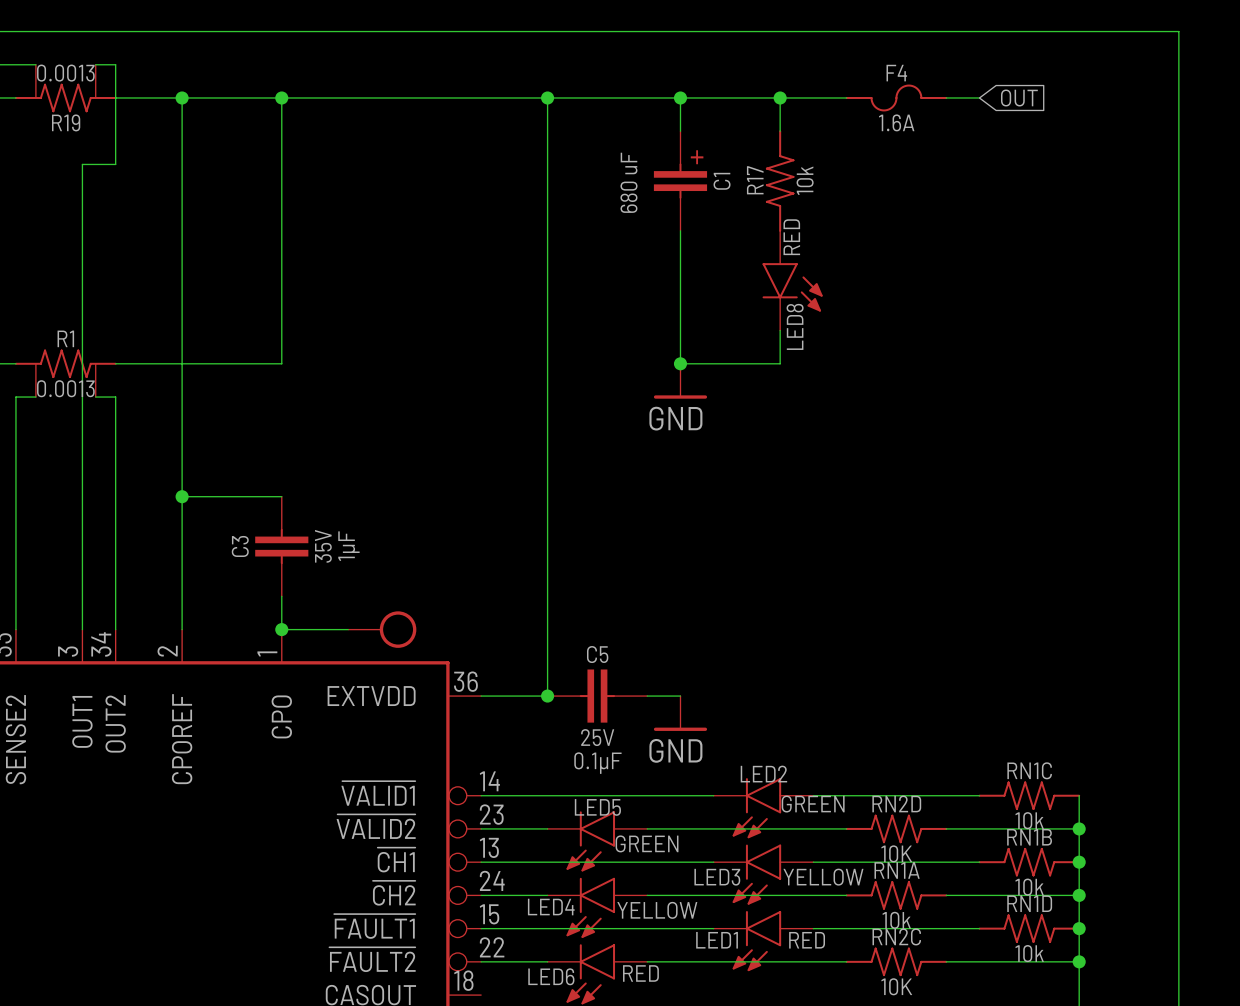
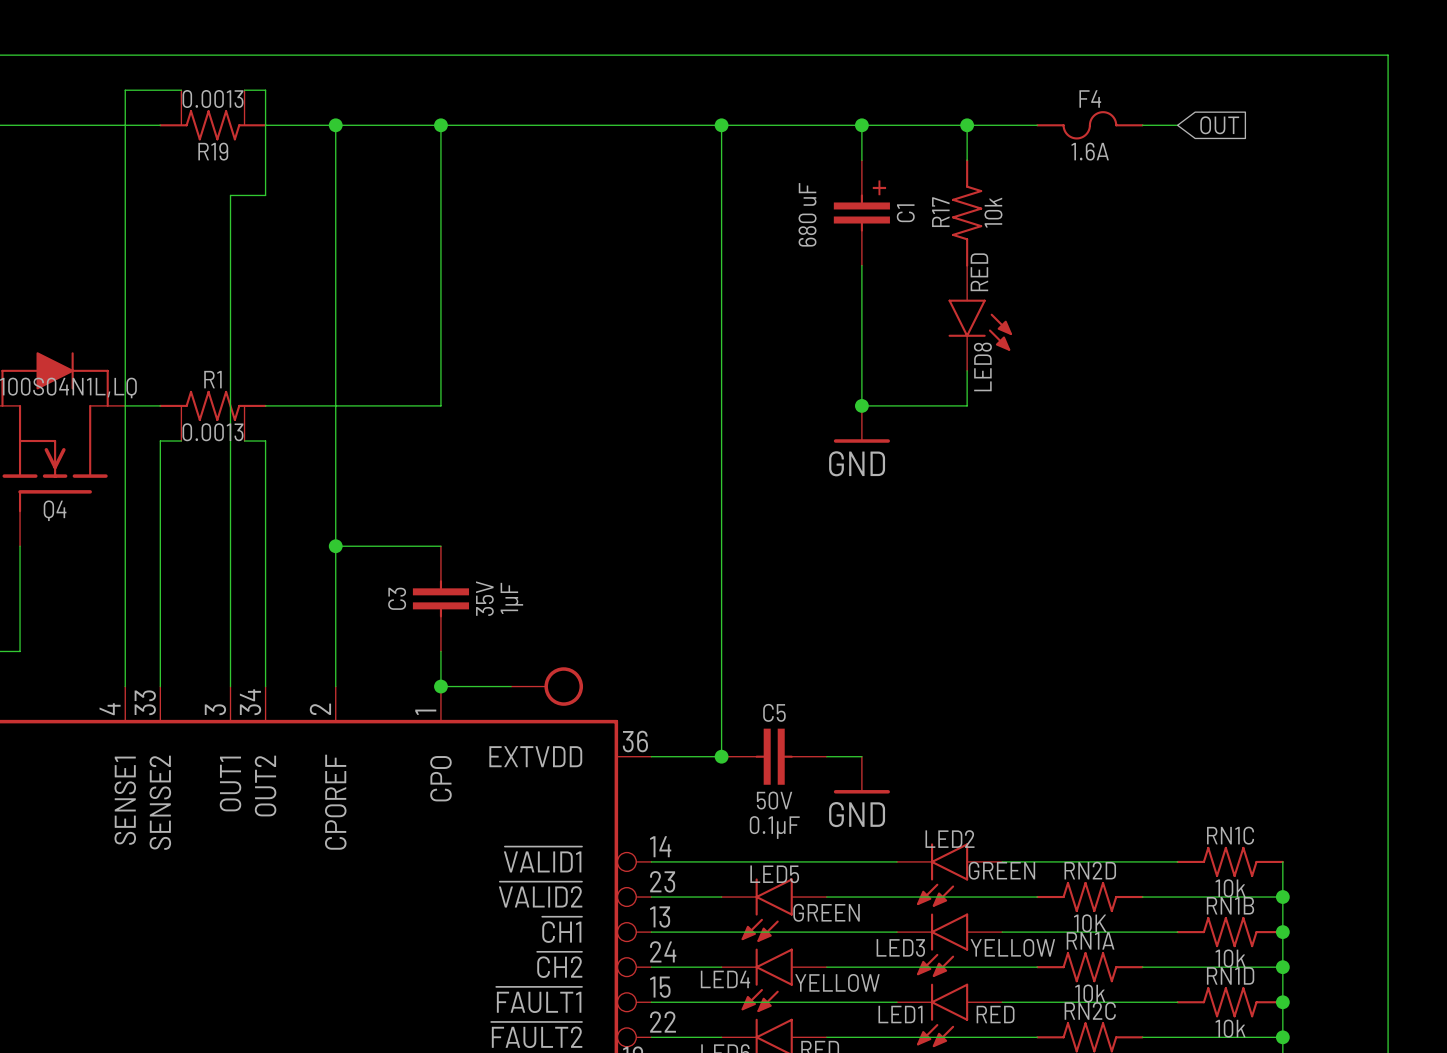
C5 text: 25V (597, 737) -> 50V (774, 800)

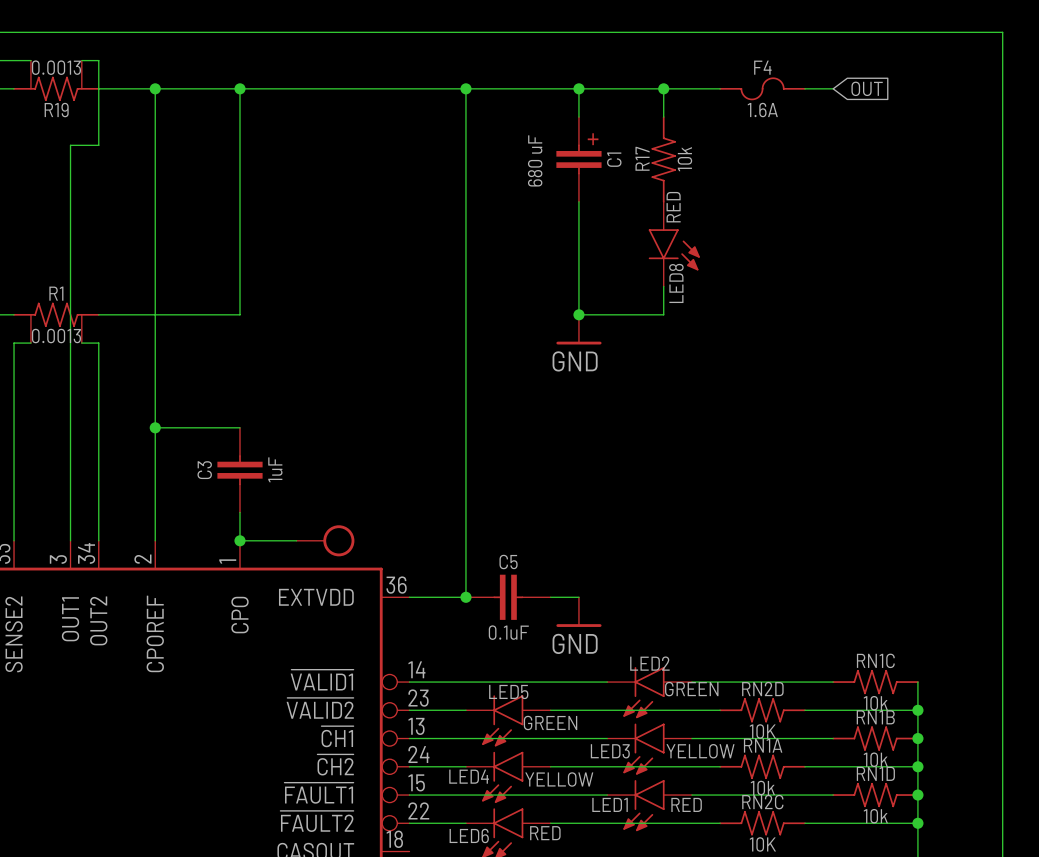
C3 text: 35V (484, 598) -> none
C3 value: none -> 1uF (275, 469)
C3 text: 1µF (511, 598) -> none
C5 text: 50V (774, 800) -> none
C5 value: none -> 0.1uF (508, 632)
C5 text: 0.1µF (774, 827) -> none

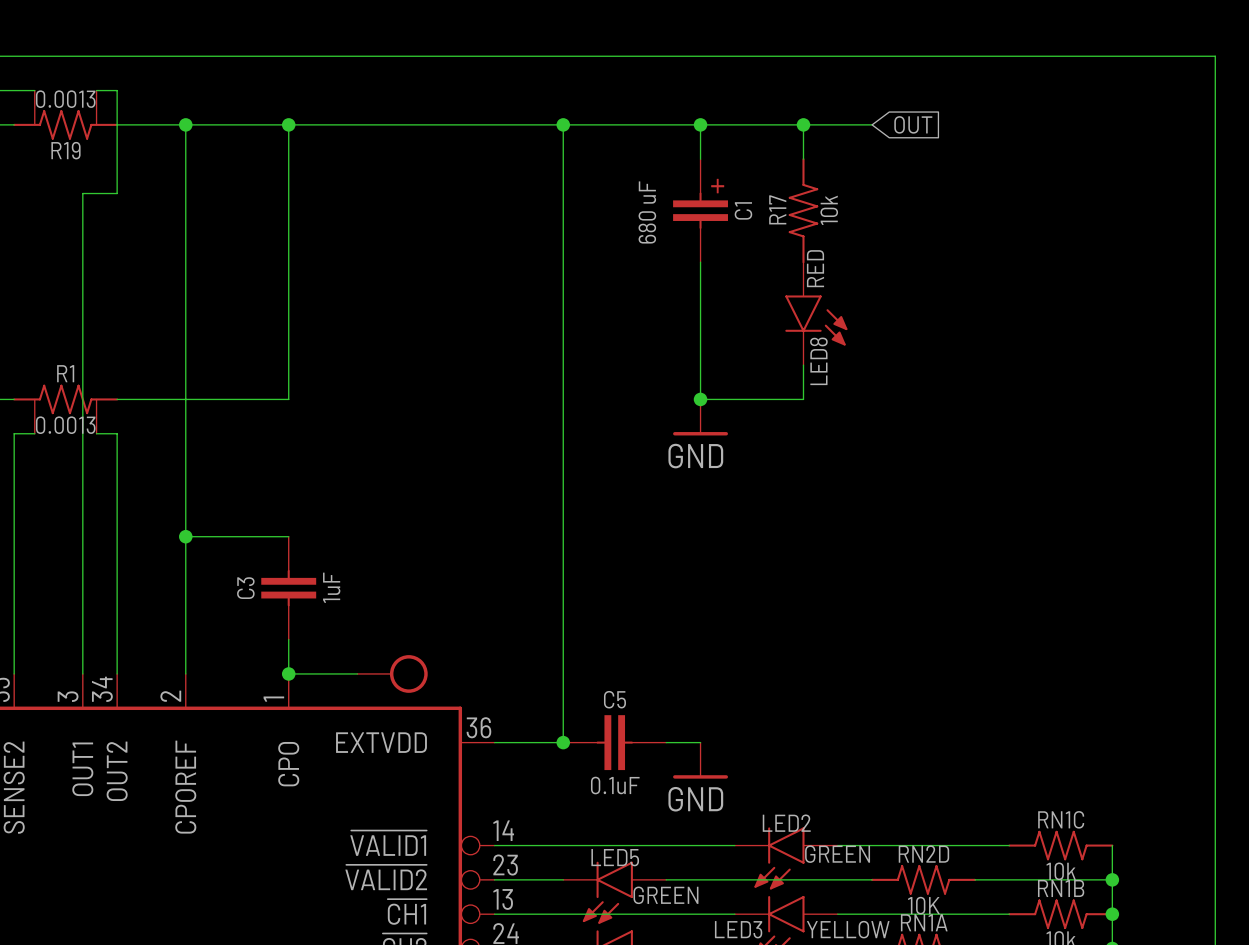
F4: (762, 88) -> none
wire: (804, 88) (833, 88) -> none
global label position: OUT (867, 88) -> OUT (913, 124)

